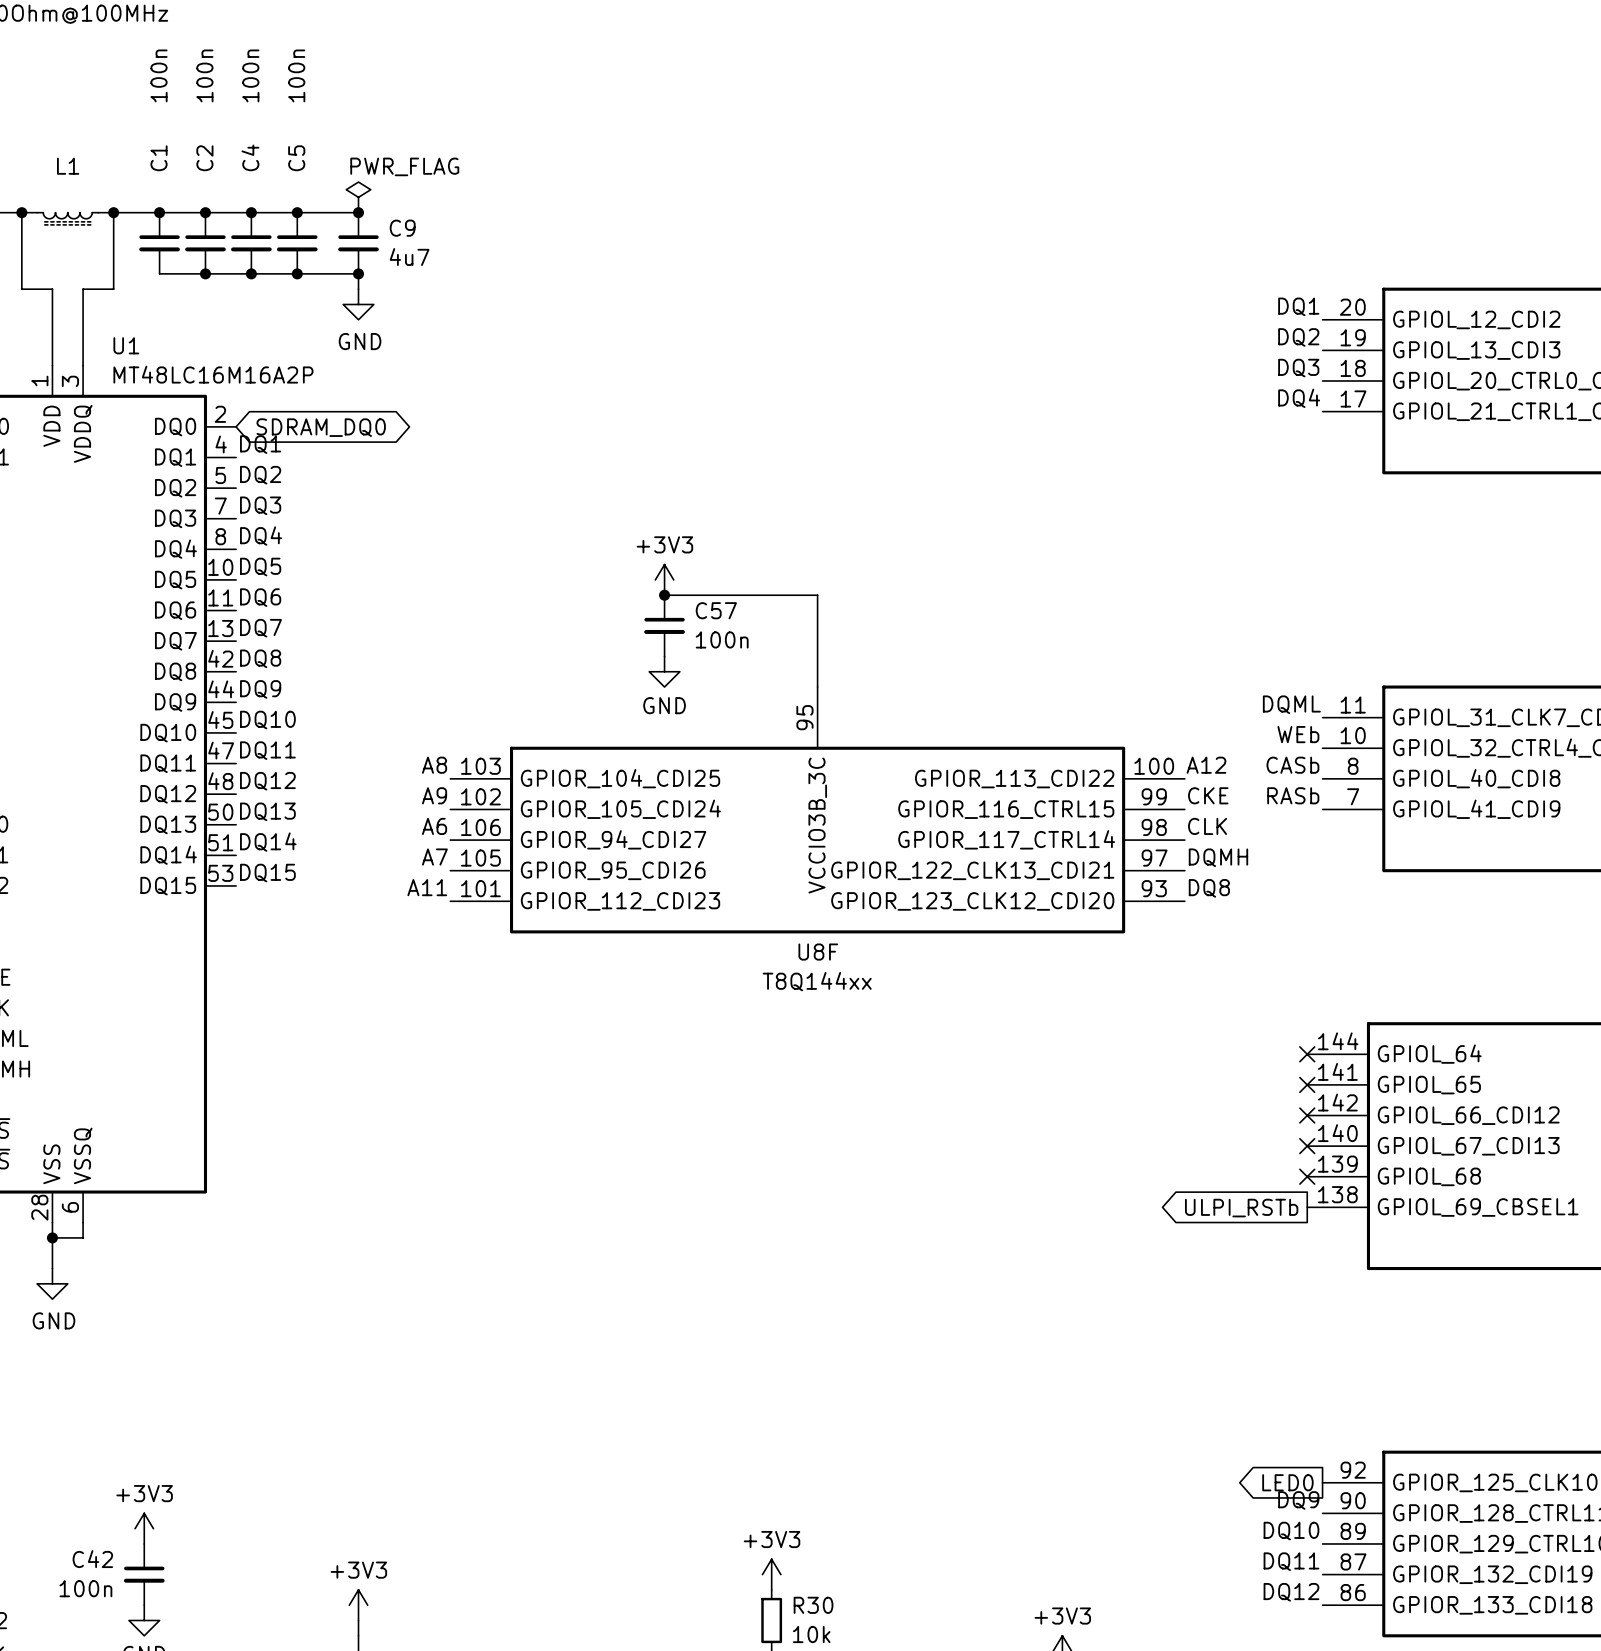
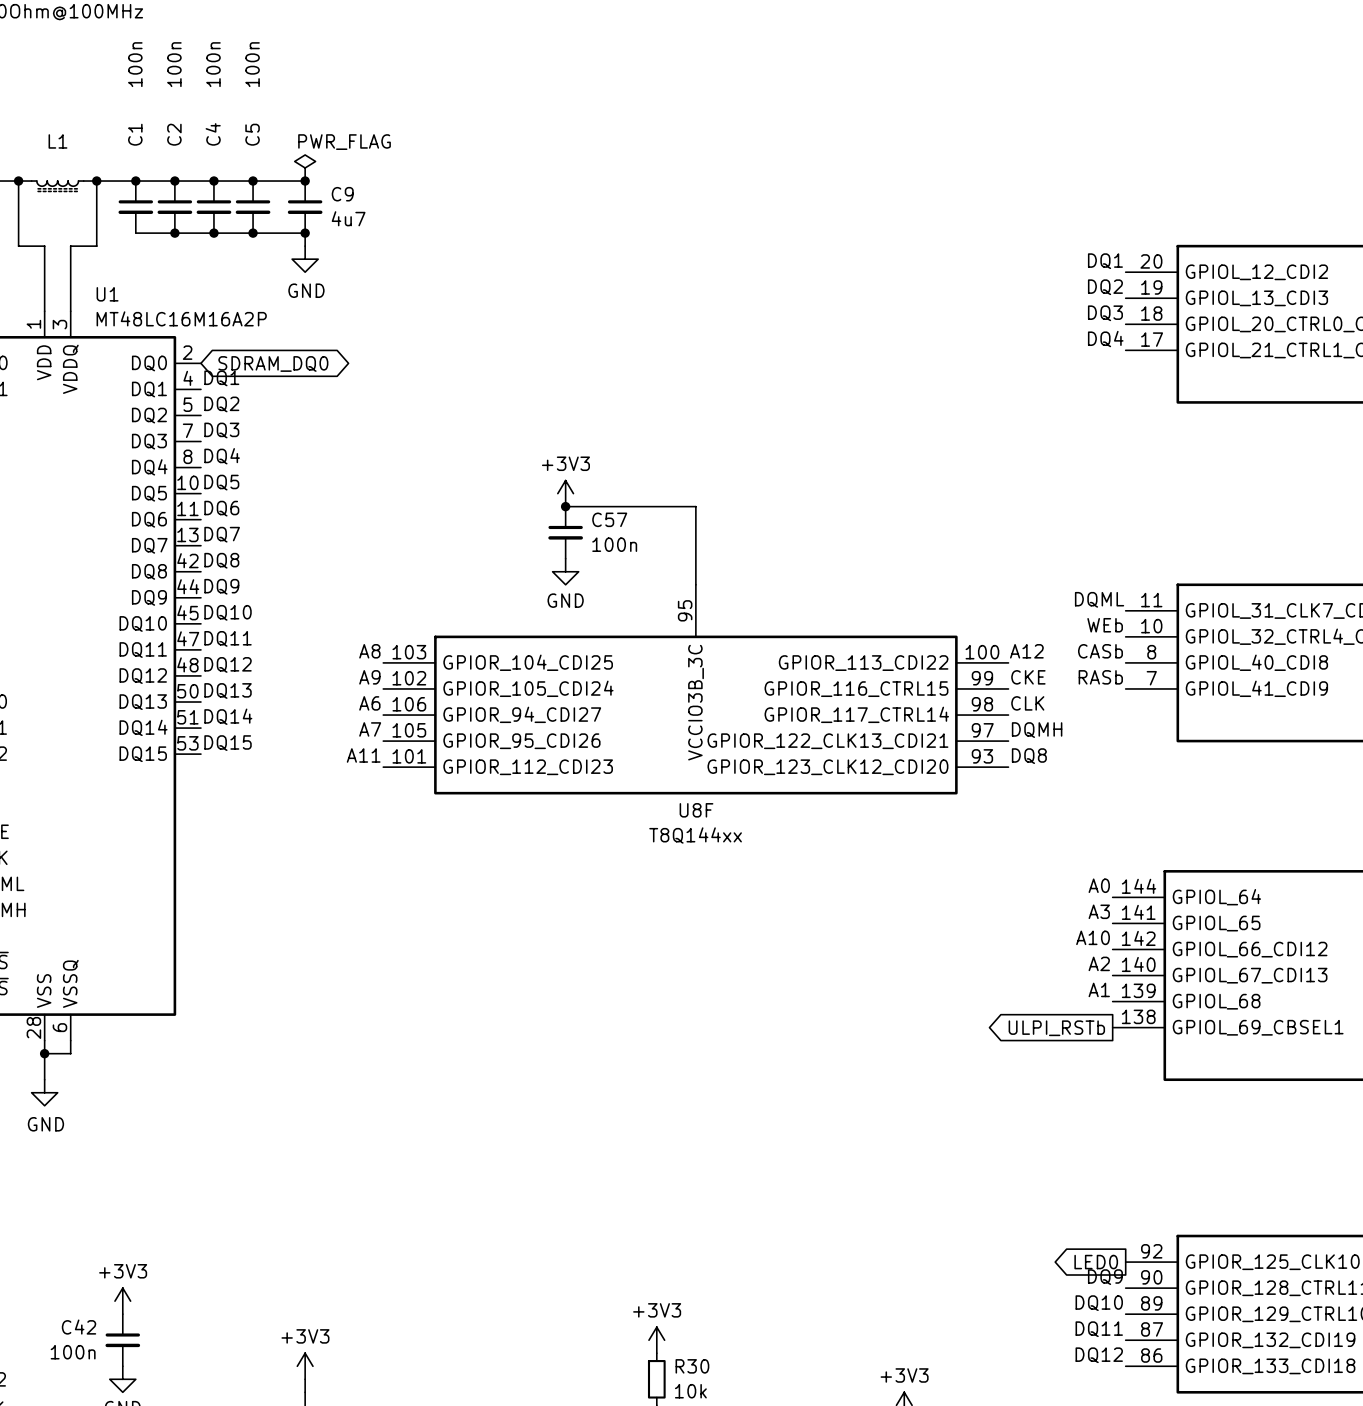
label: none -> A0 (1099, 885)
no-connect mark: (1307, 1054) -> none
label: none -> A3 (1099, 911)
no-connect mark: (1307, 1084) -> none
label: none -> A10 (1093, 937)
no-connect mark: (1307, 1115) -> none
label: none -> A2 (1099, 963)
no-connect mark: (1307, 1146) -> none
label: none -> A1 (1099, 989)
no-connect mark: (1307, 1176) -> none

